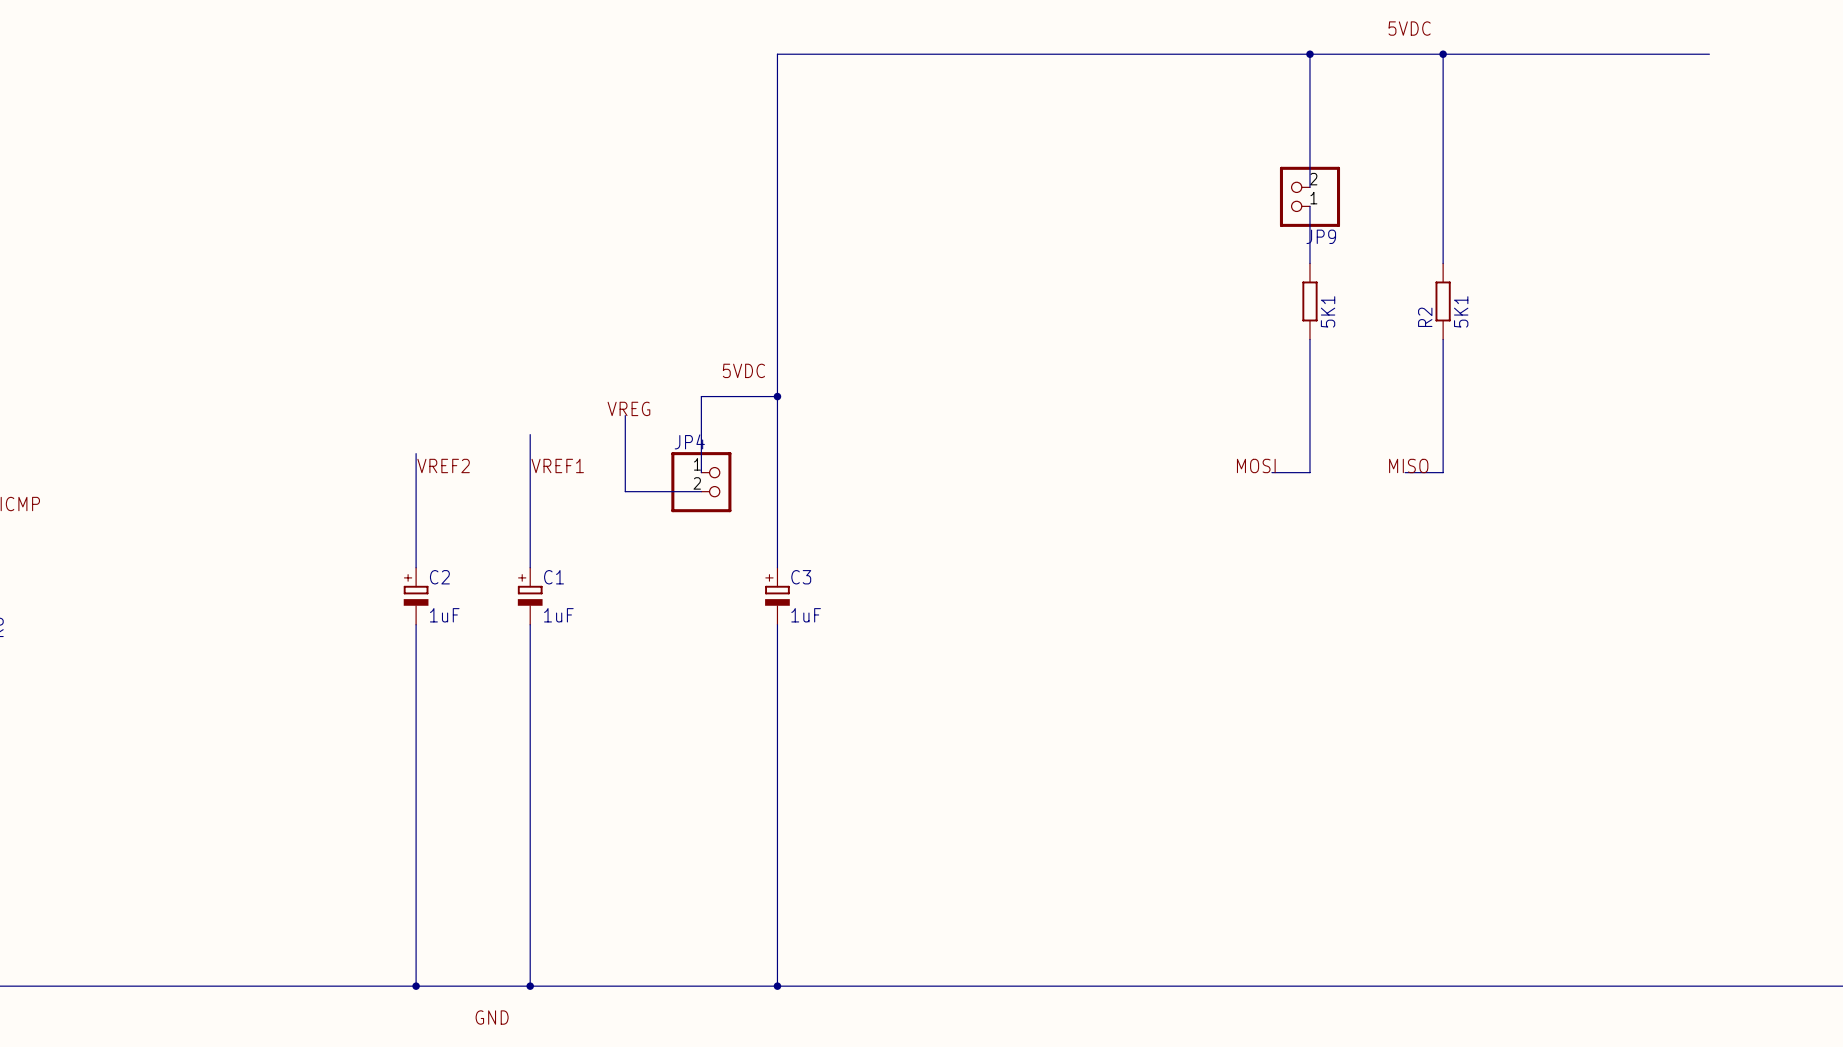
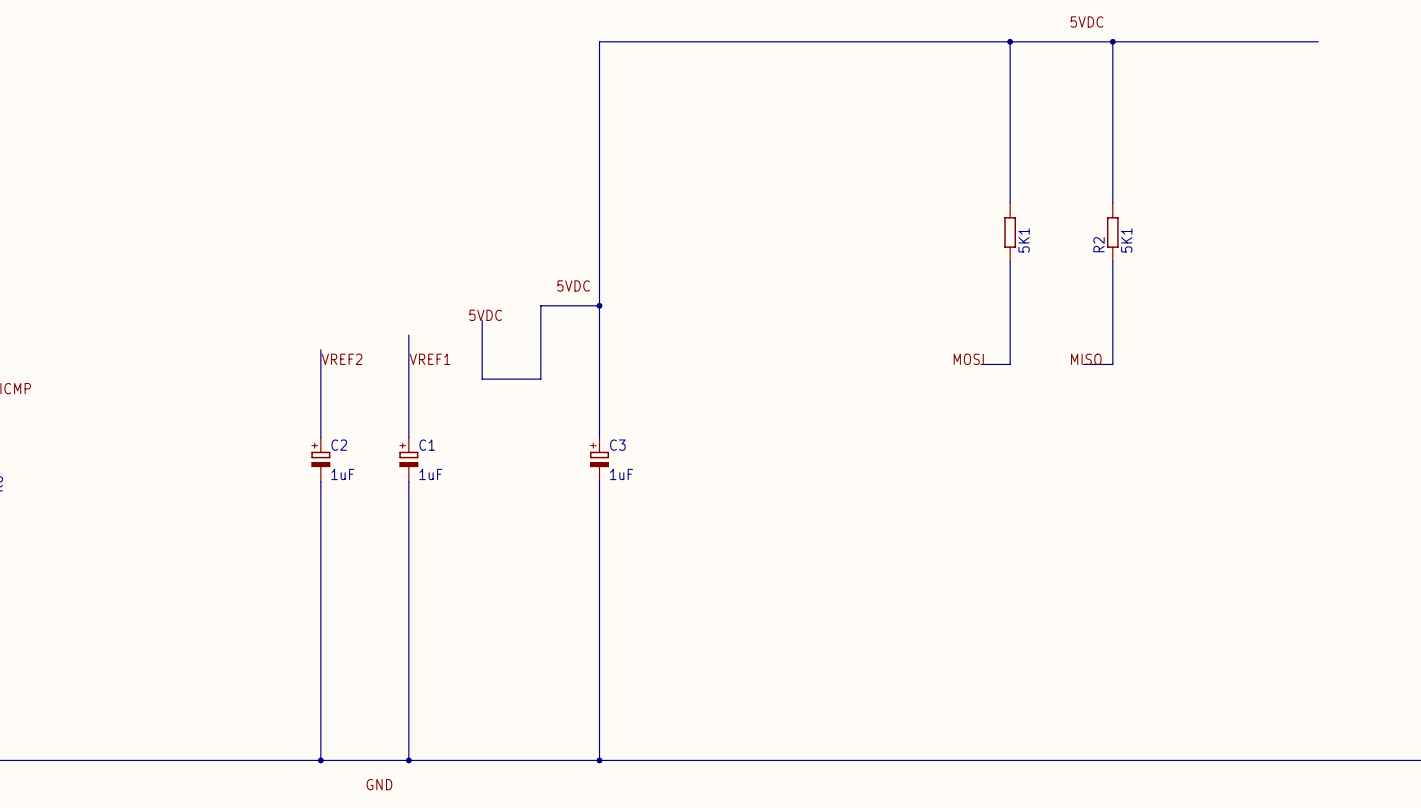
wire: none -> (1010, 144) (1010, 159)
JP9: (1309, 196) -> none
label: VREG (628, 408) -> 5VDC (485, 315)
wire: none -> (540, 364) (540, 379)
JP4: (701, 482) -> none

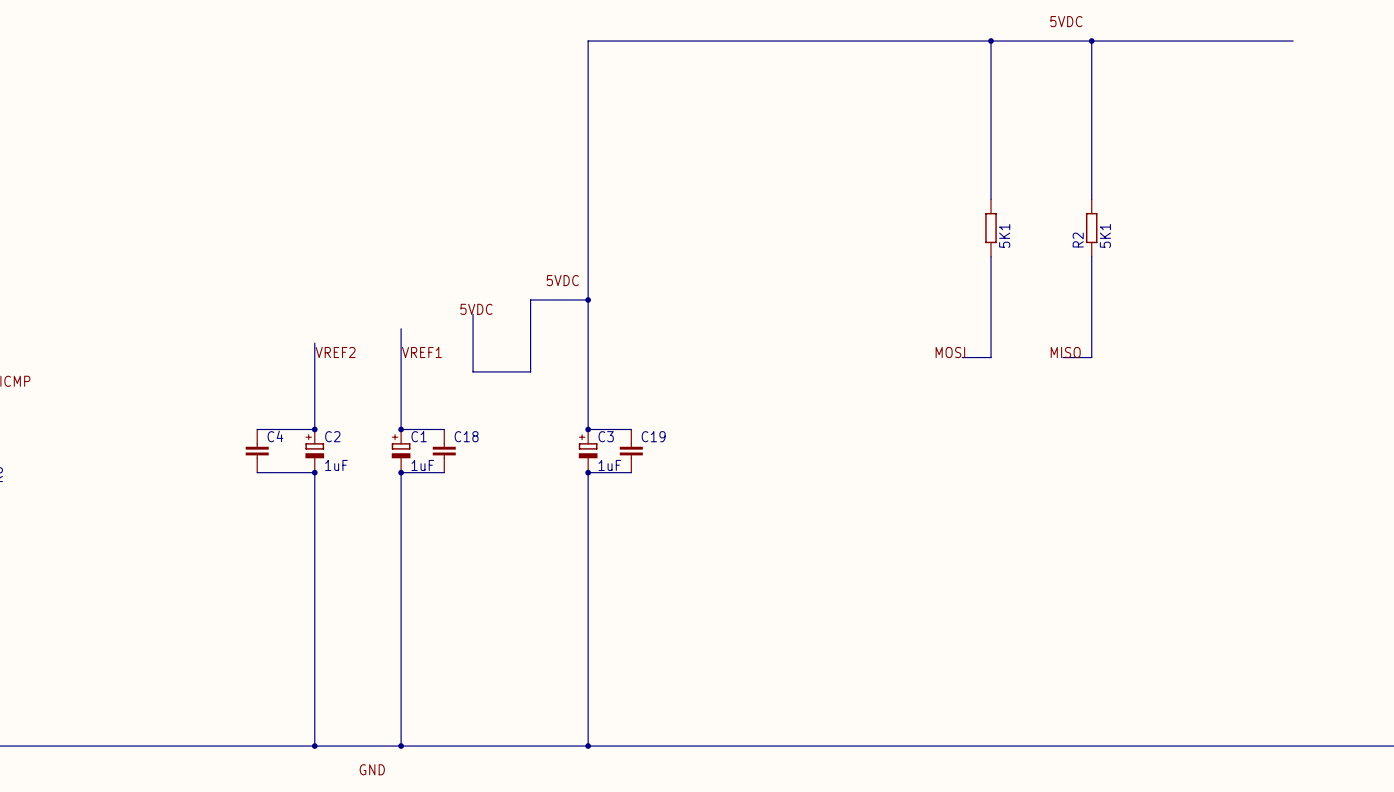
wire: none -> (257, 429) (314, 429)
junction: none -> (314, 429)
wire: none -> (401, 429) (444, 429)
junction: none -> (401, 429)
wire: none -> (588, 429) (631, 429)
junction: none -> (588, 429)
C4: none -> (257, 451)
C18: none -> (444, 451)
C19: none -> (631, 451)
wire: none -> (257, 472) (314, 472)
junction: none -> (314, 472)
wire: none -> (401, 472) (444, 472)
junction: none -> (401, 472)
wire: none -> (588, 472) (631, 472)
junction: none -> (588, 472)

